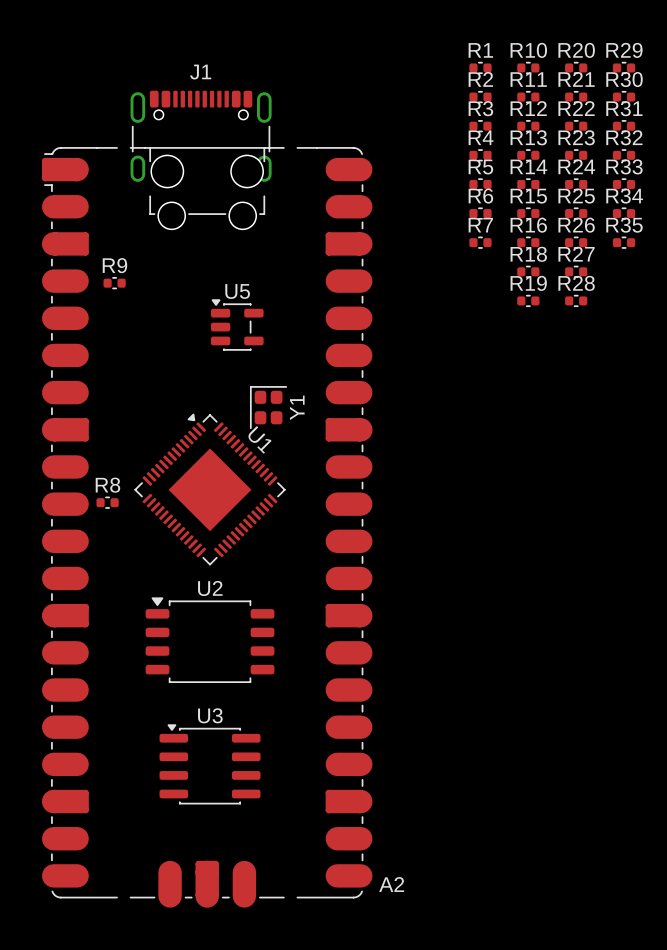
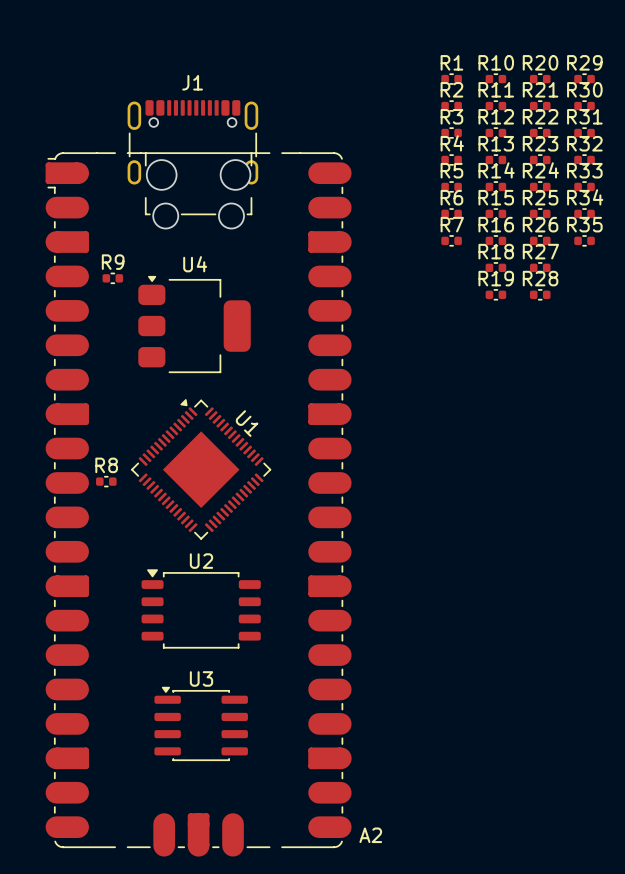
U5: (237, 325) -> none
U4: none -> (194, 324)
Y1: (268, 407) -> none

